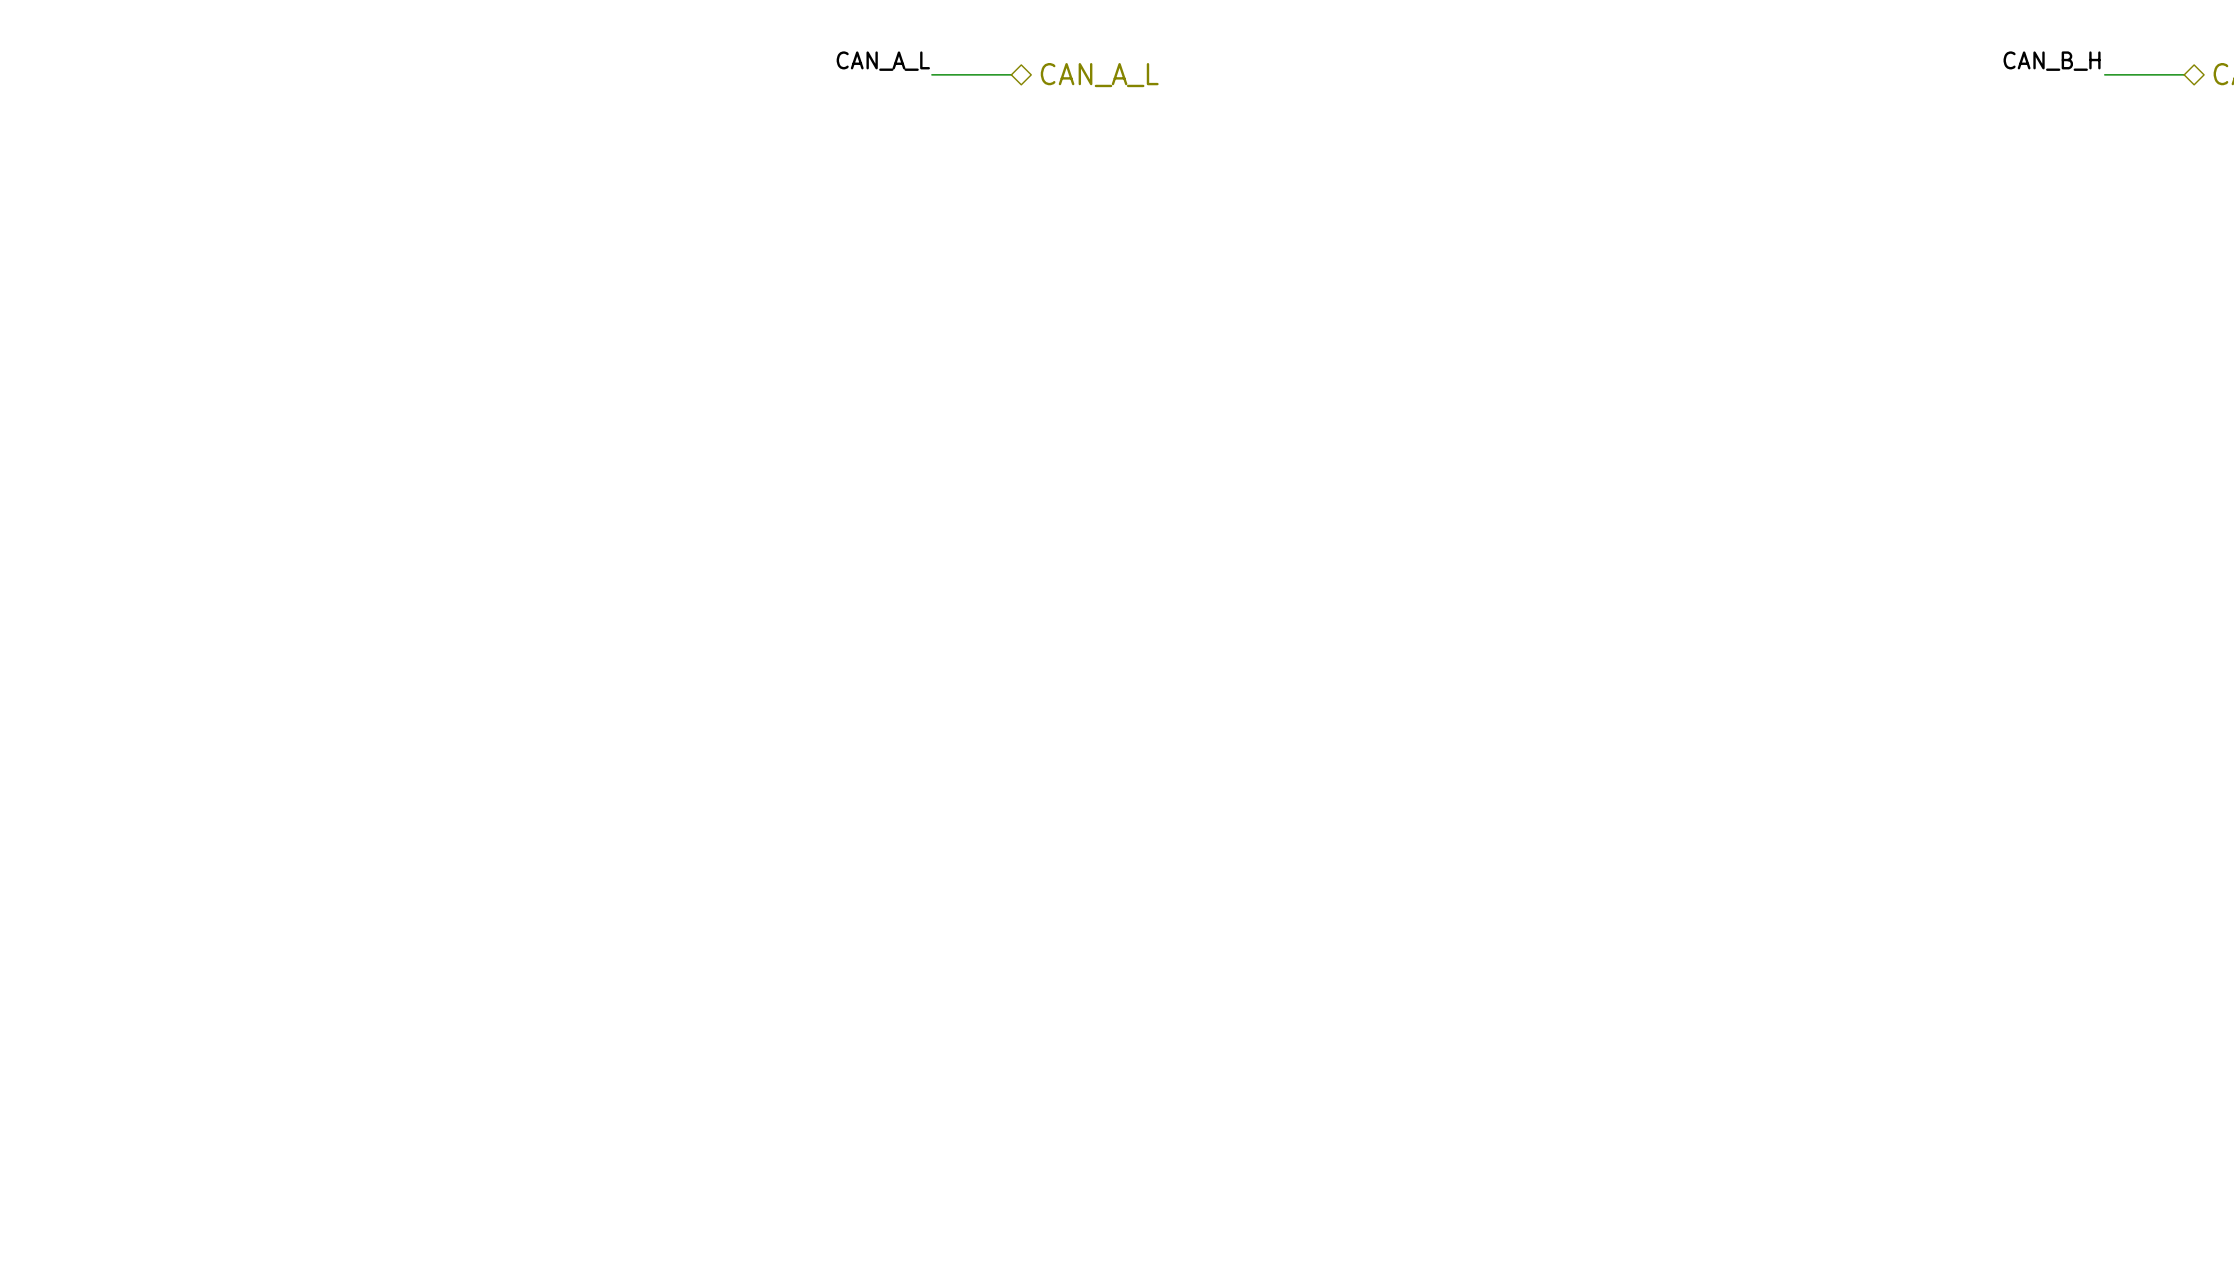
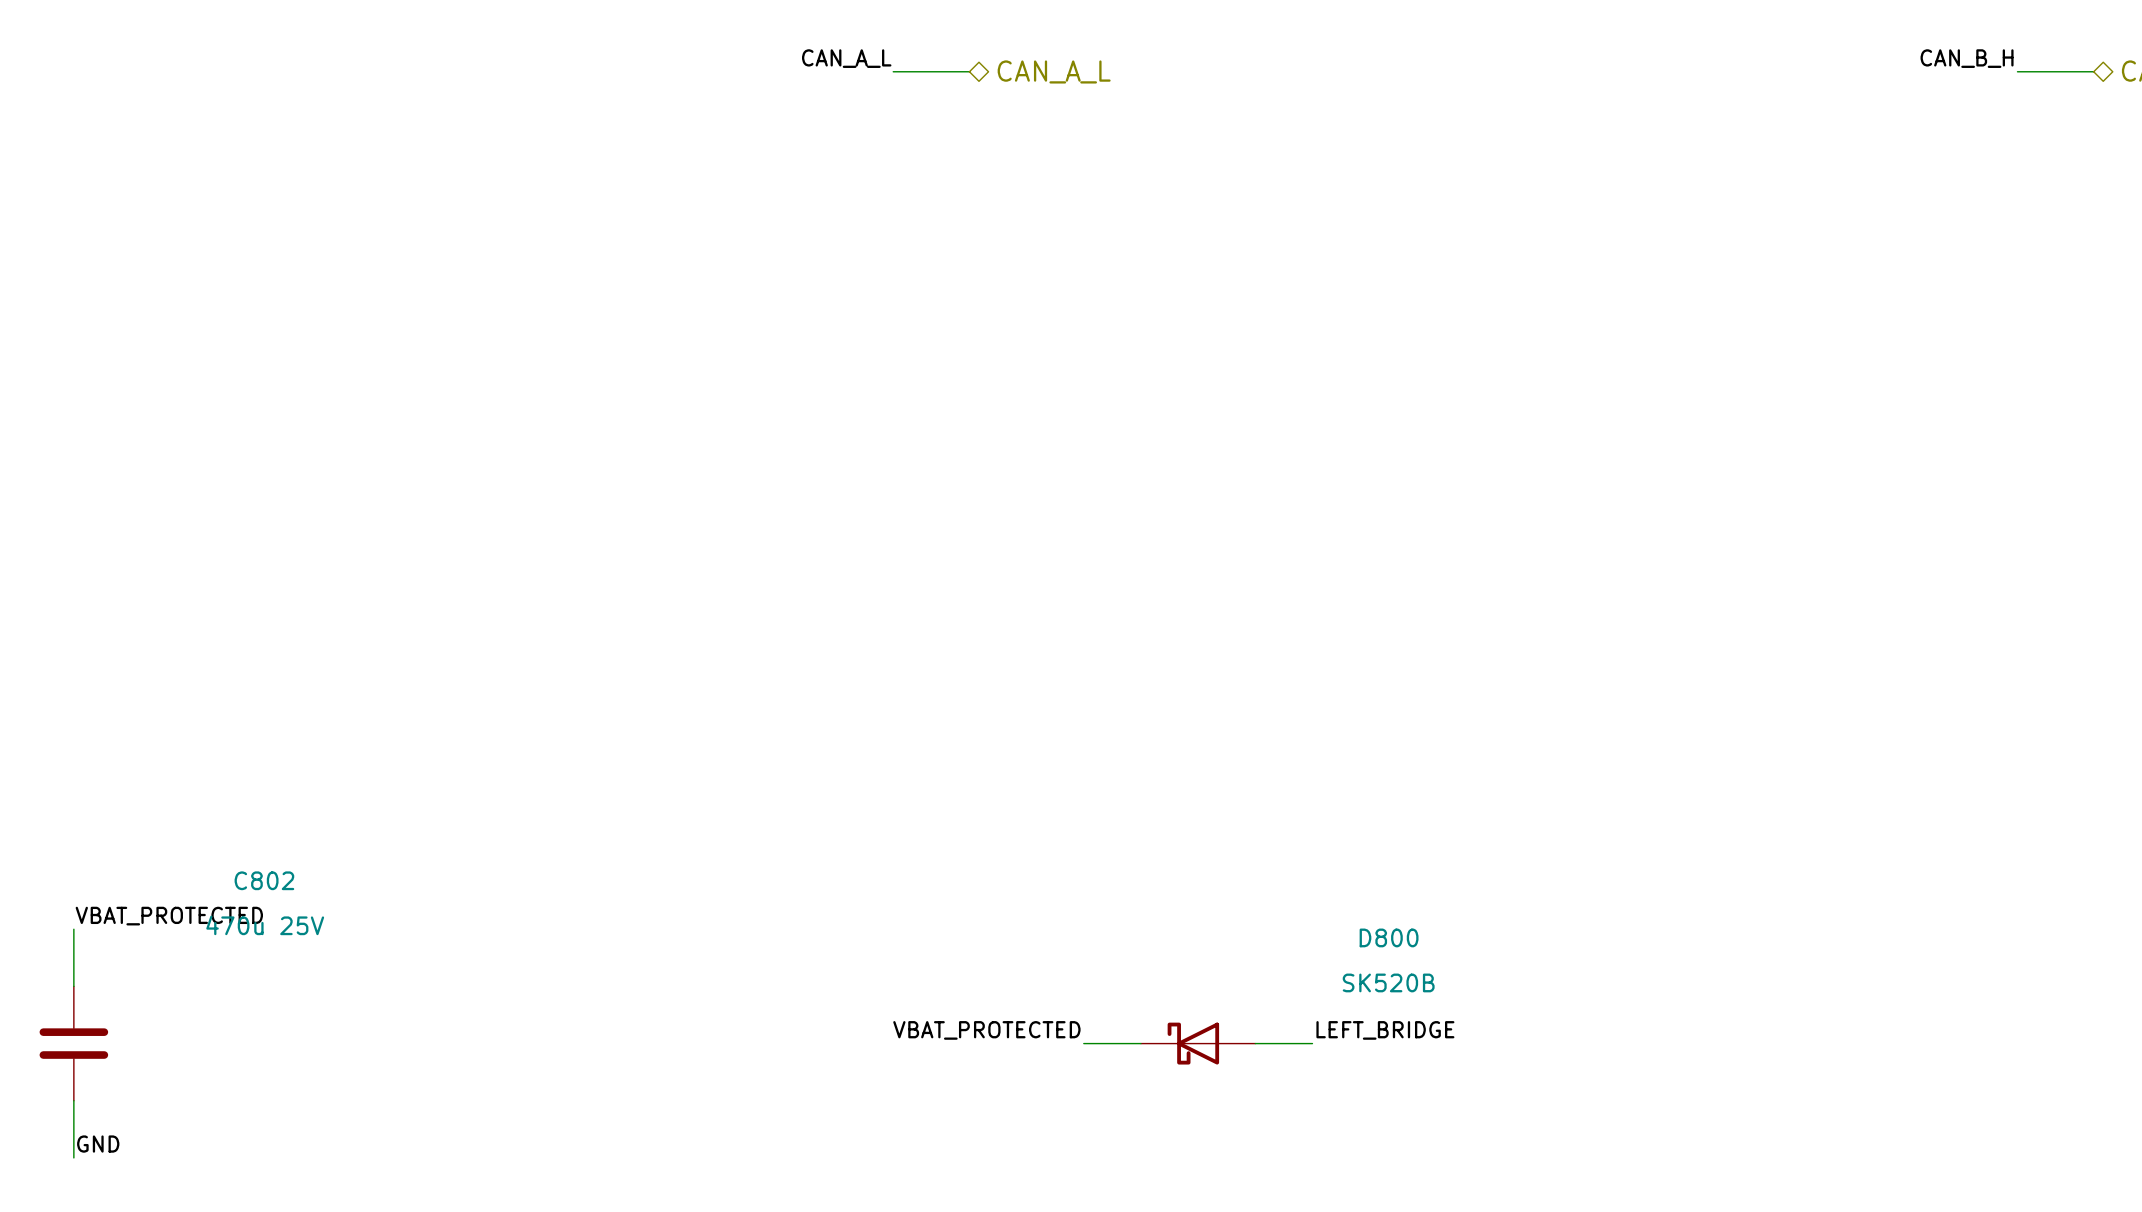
label: none -> VBAT_PROTECTED (169, 916)
wire: none -> (73, 929) (73, 986)
label: none -> VBAT_PROTECTED (986, 1030)
label: none -> LEFT_BRIDGE (1385, 1030)
C802: none -> 470u 25V (73, 1043)
wire: none -> (1083, 1043) (1140, 1043)
D800: none -> SK520B (1198, 1043)
wire: none -> (1255, 1043) (1312, 1043)
wire: none -> (73, 1100) (73, 1157)
label: none -> GND (98, 1144)

